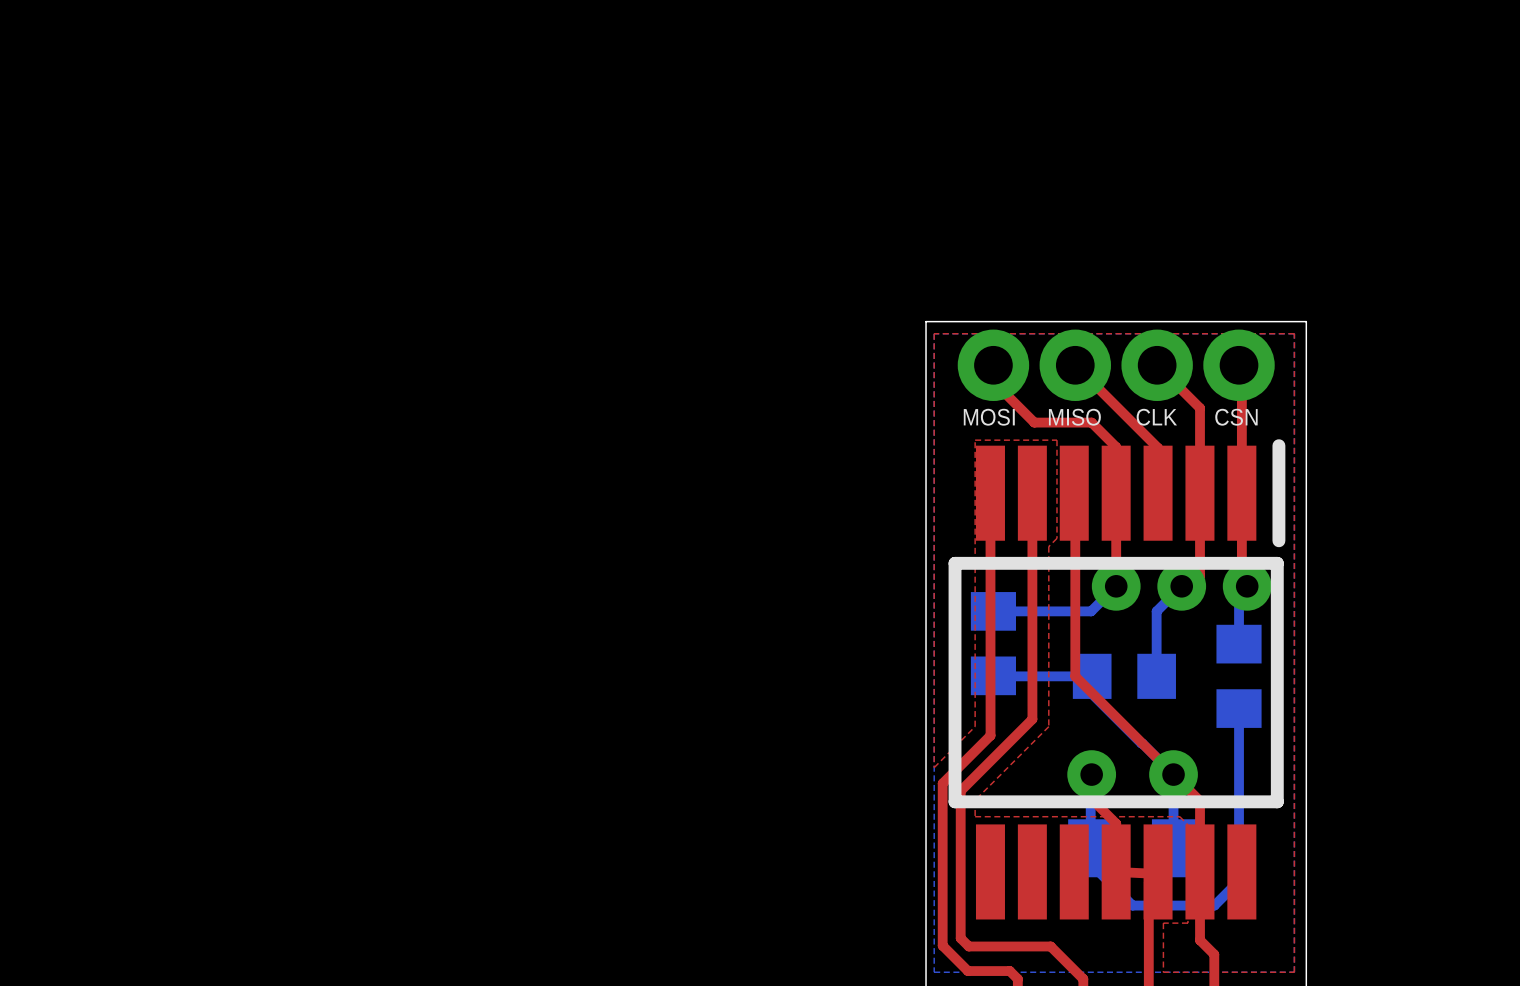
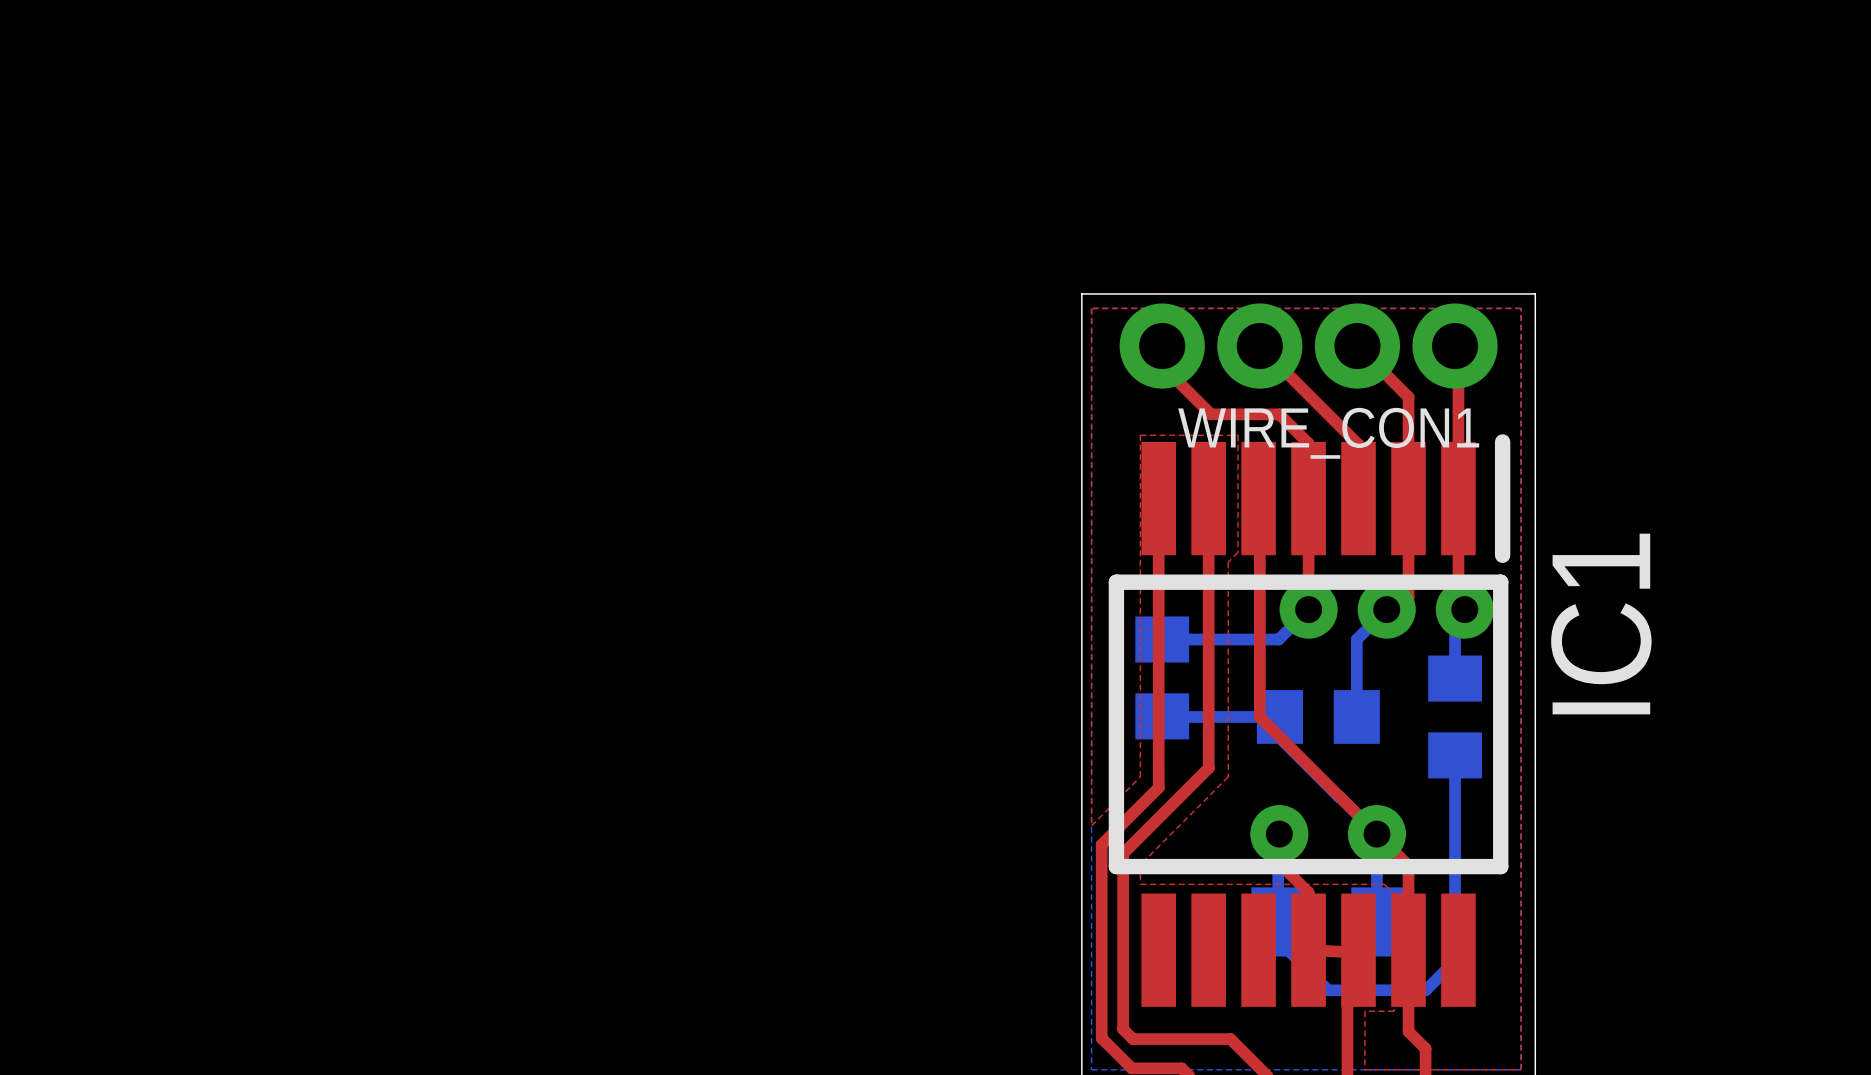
text: MOSI (989, 417) -> none
text: MISO (1074, 417) -> none
text: CLK (1156, 417) -> none
text: CSN (1236, 417) -> none
WIRE_CON1 name: none -> WIRE_CON1 (1328, 433)
IC1 name: none -> IC1 (1601, 624)

